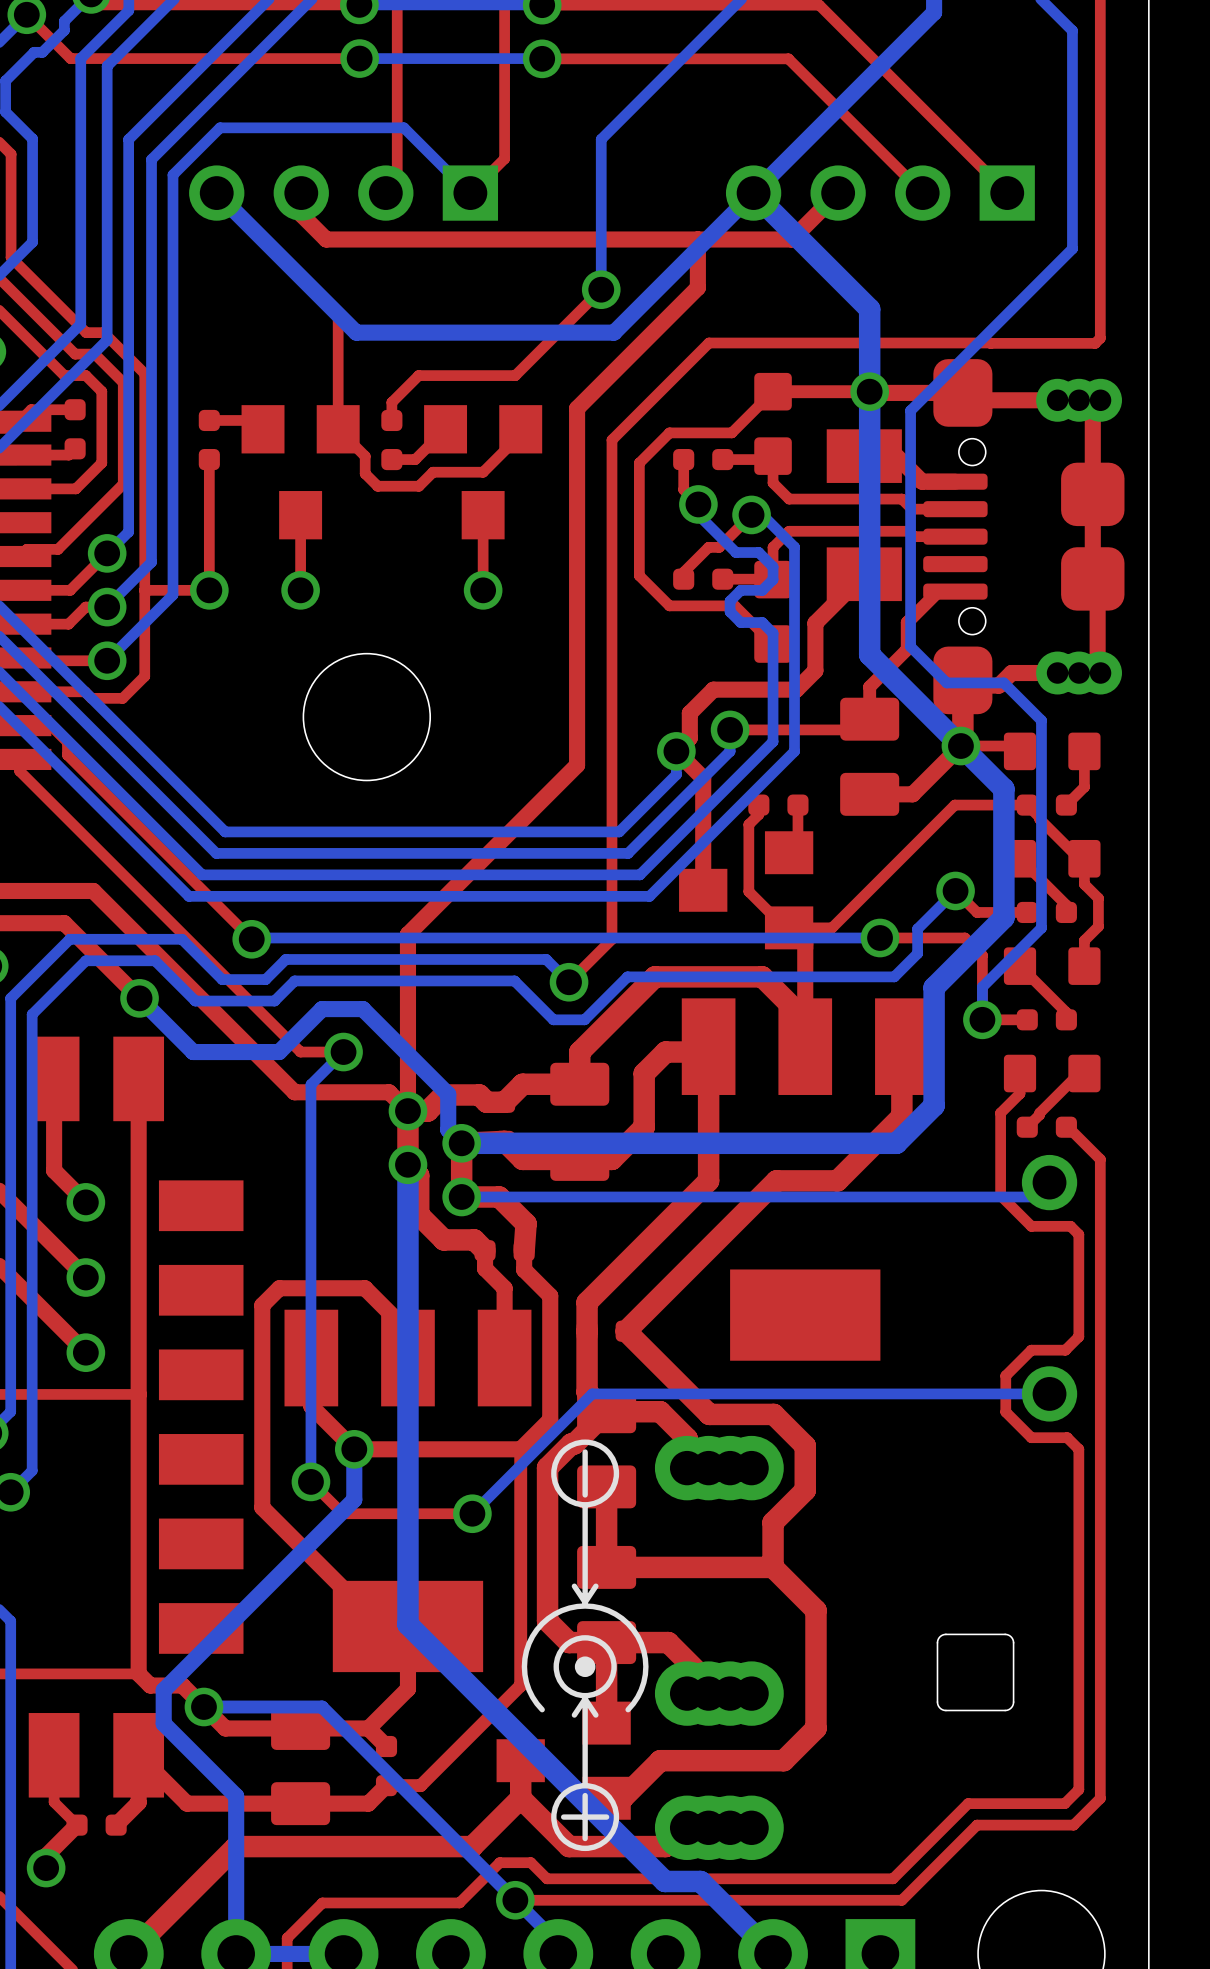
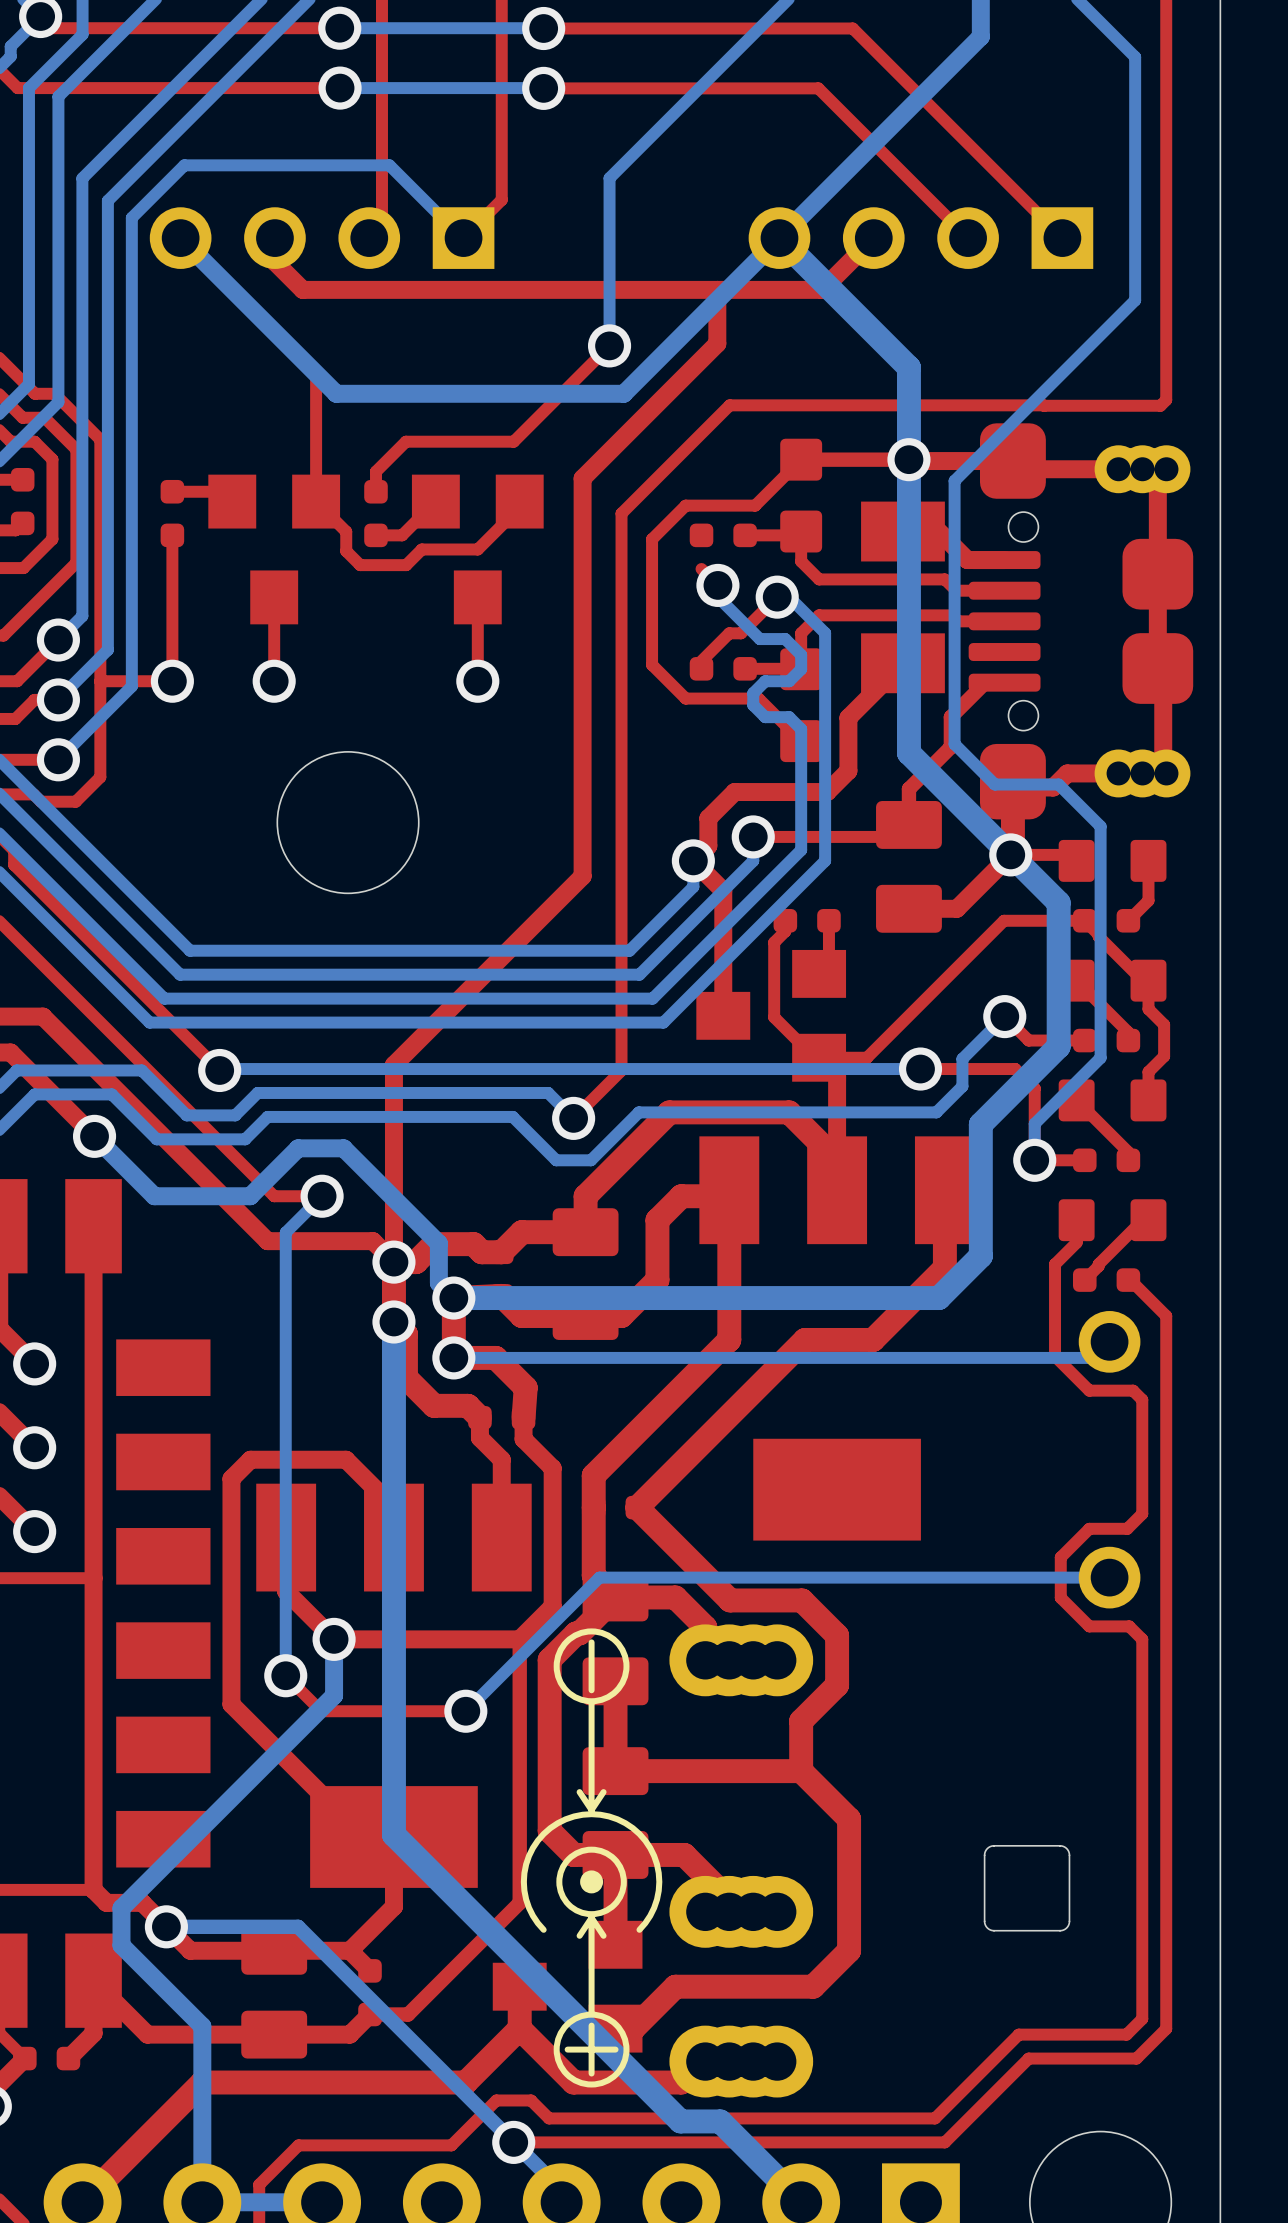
top track: (683, 459) (683, 489) -> none

